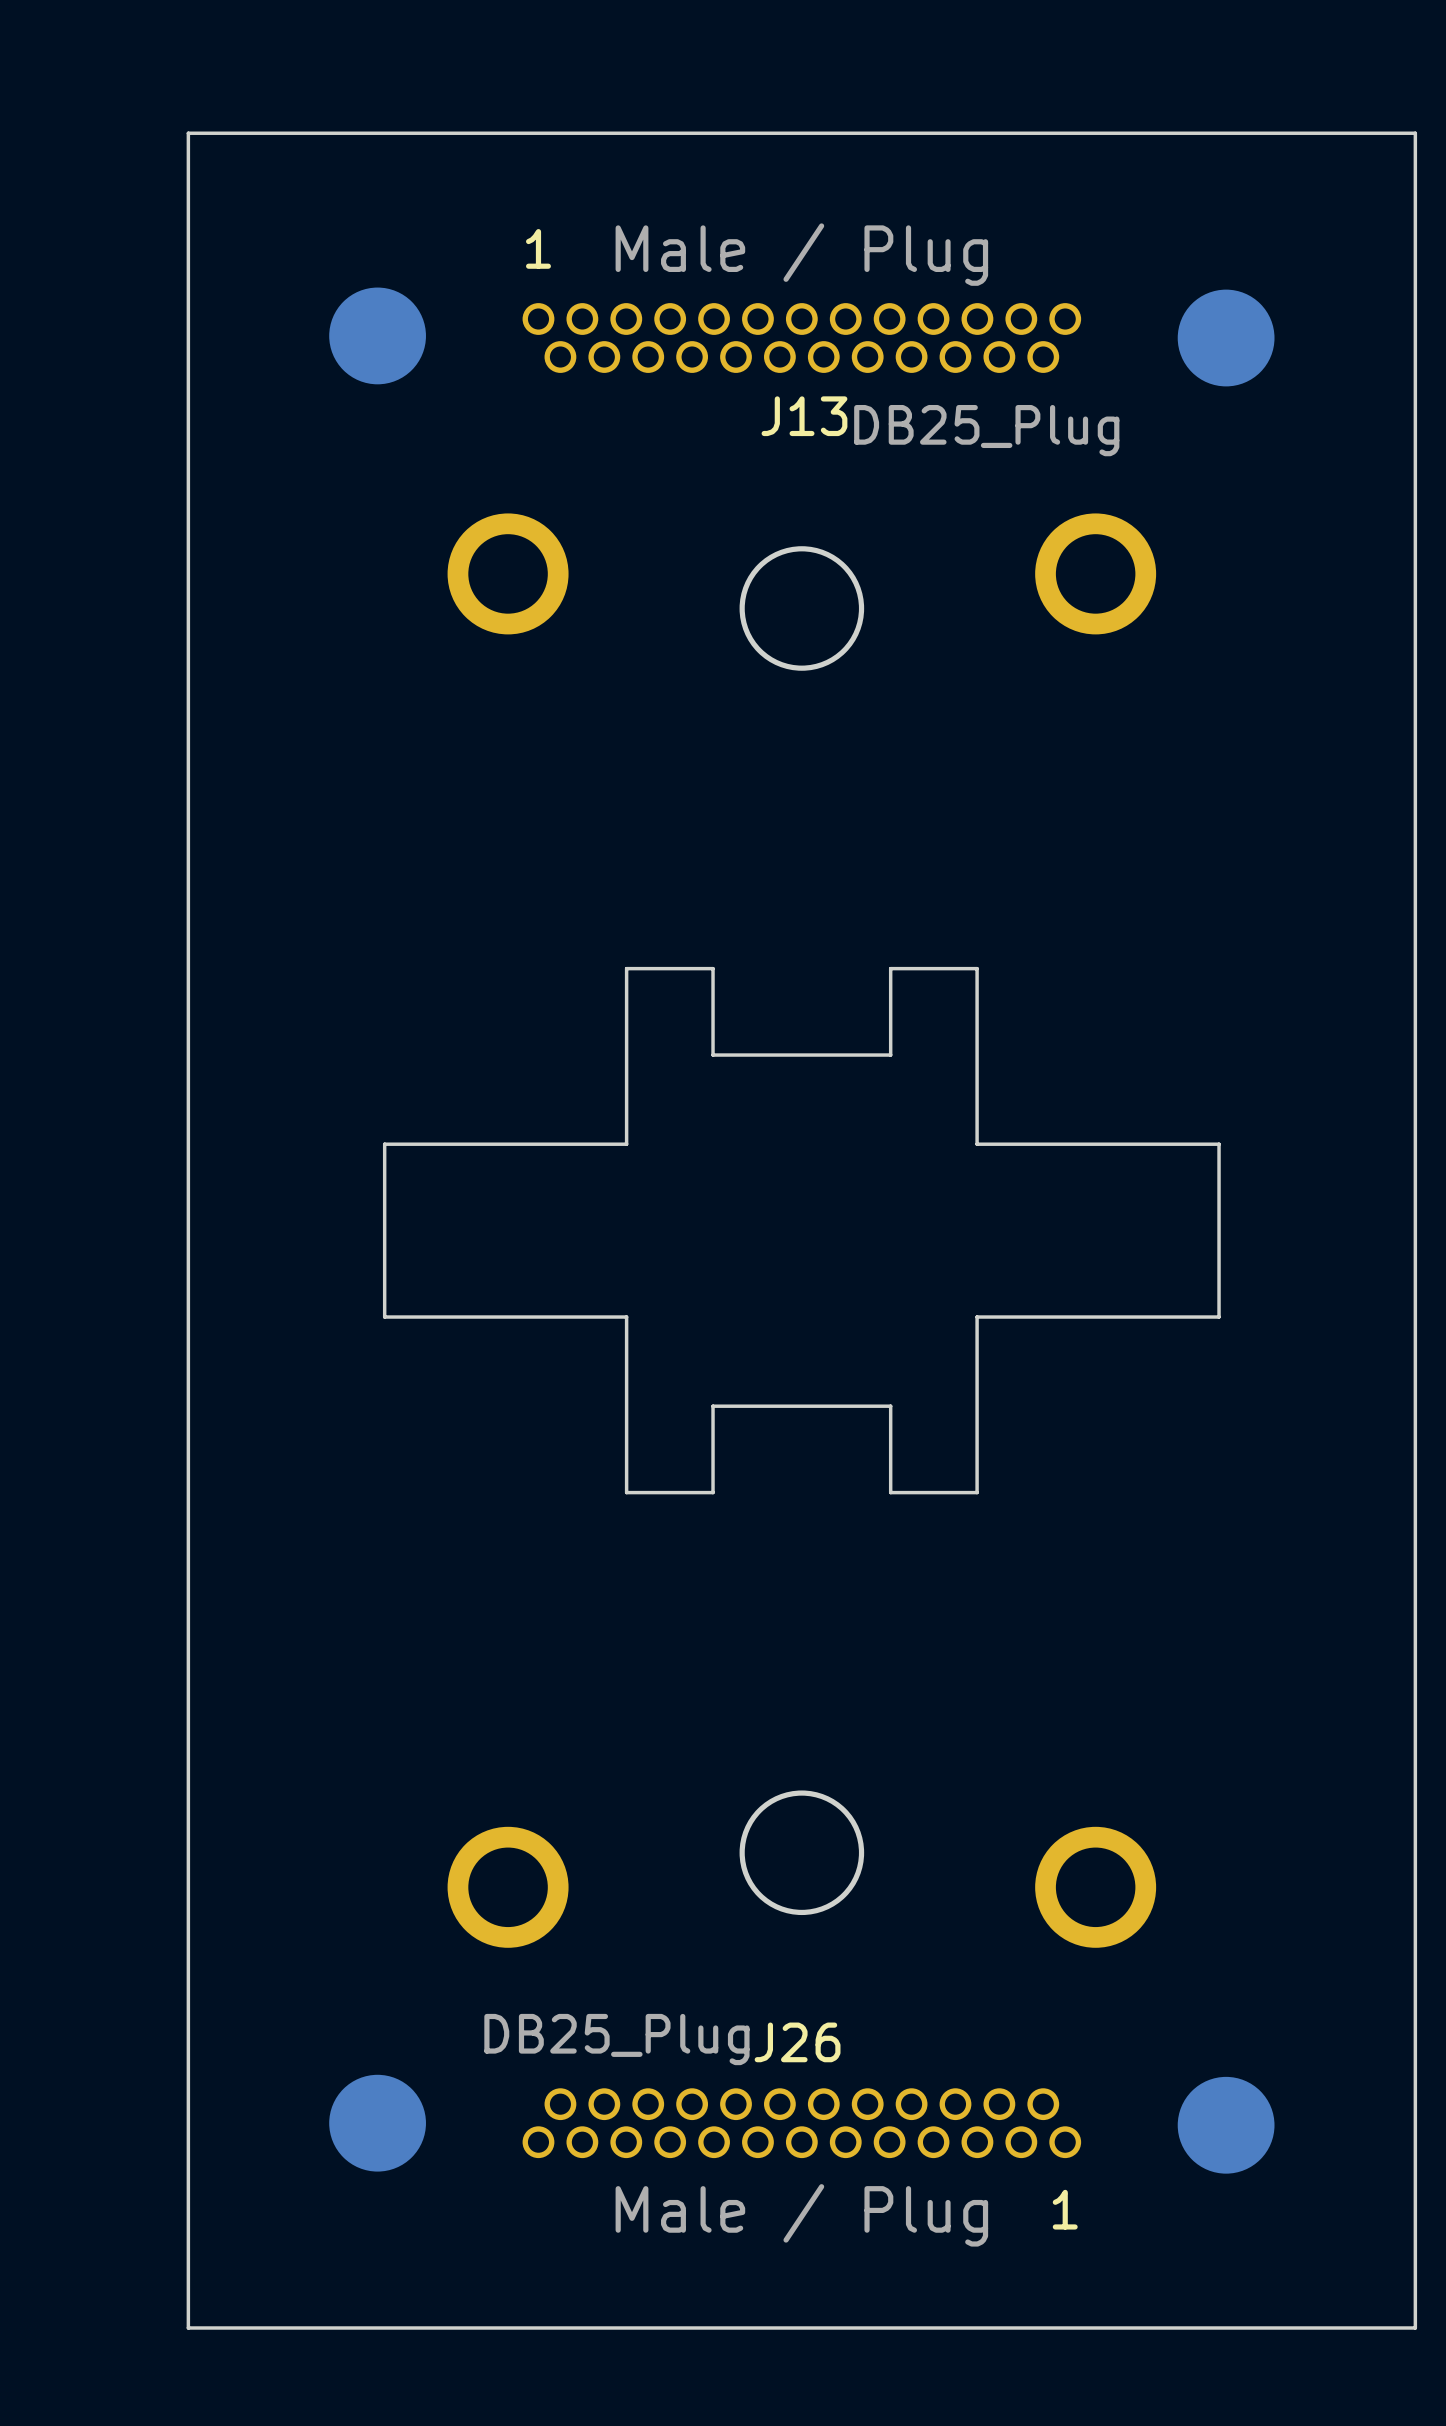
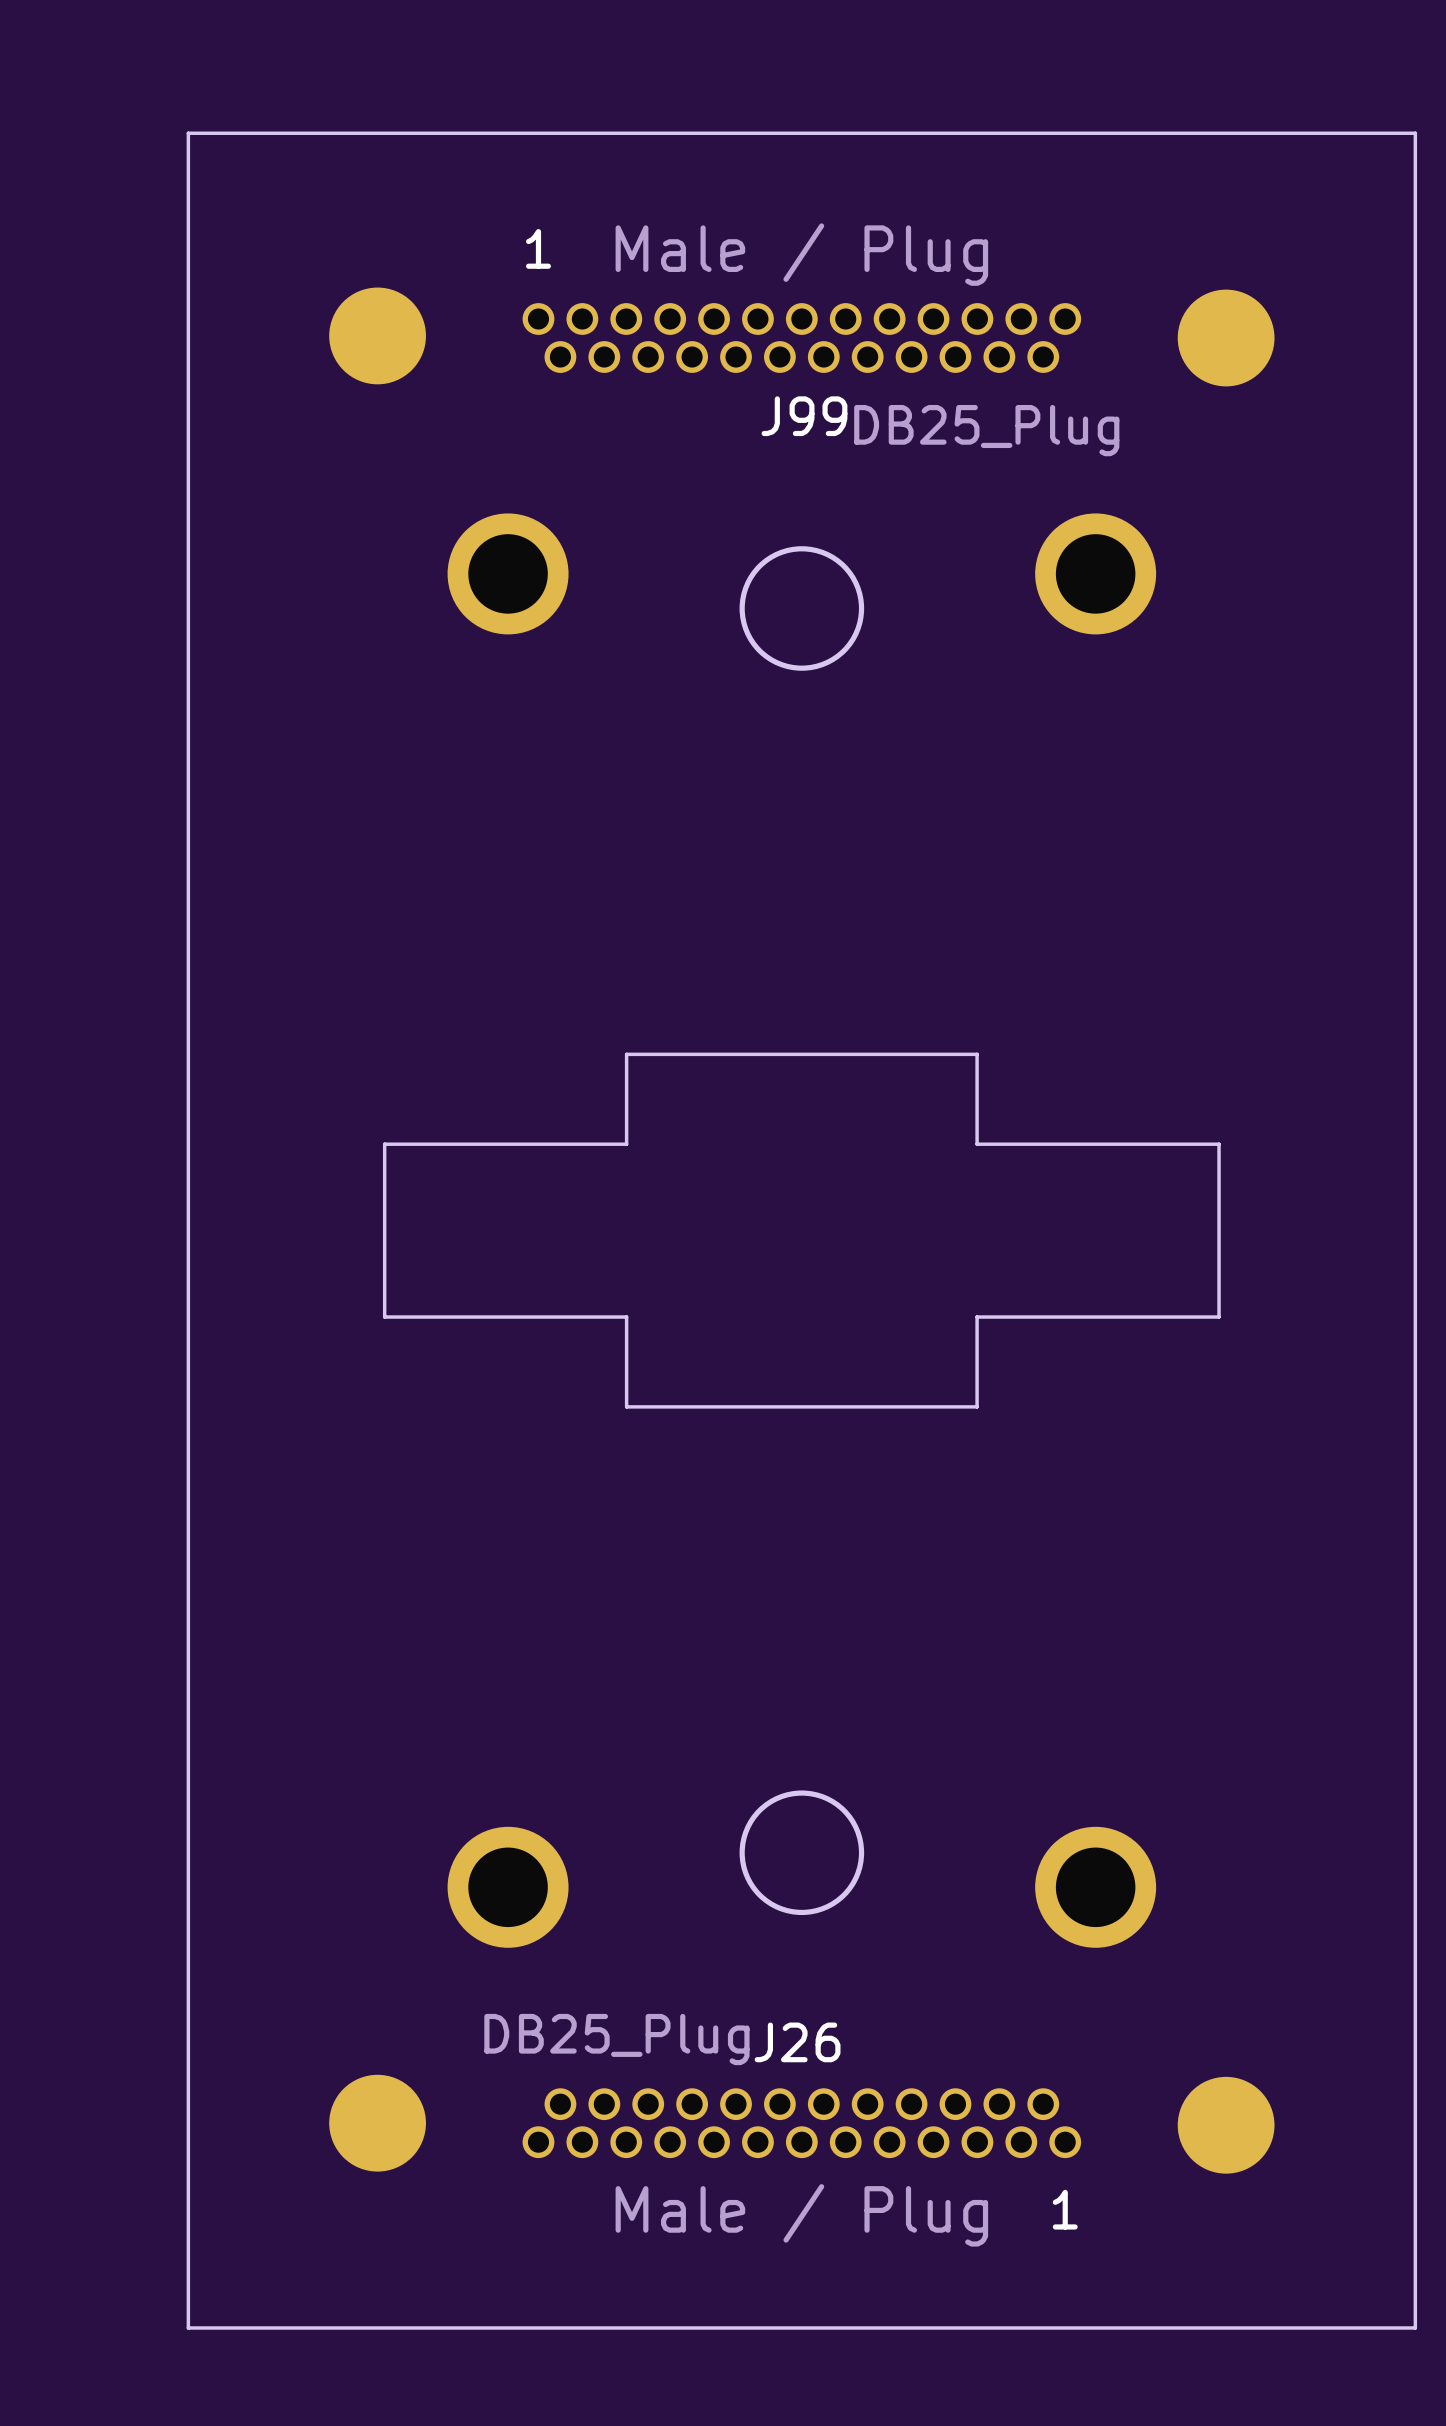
J13 name: J13 (804, 416) -> J99 (804, 416)
board edge: (977, 1054) (977, 968) (890, 968) (890, 1055) (713, 1055) (713, 968) (626, 968) (626, 1054) -> (977, 1054) (626, 1054)
board edge: (977, 1406) (977, 1492) (890, 1492) (890, 1406) (713, 1406) (713, 1492) (626, 1492) (626, 1406) -> (977, 1406) (626, 1406)

